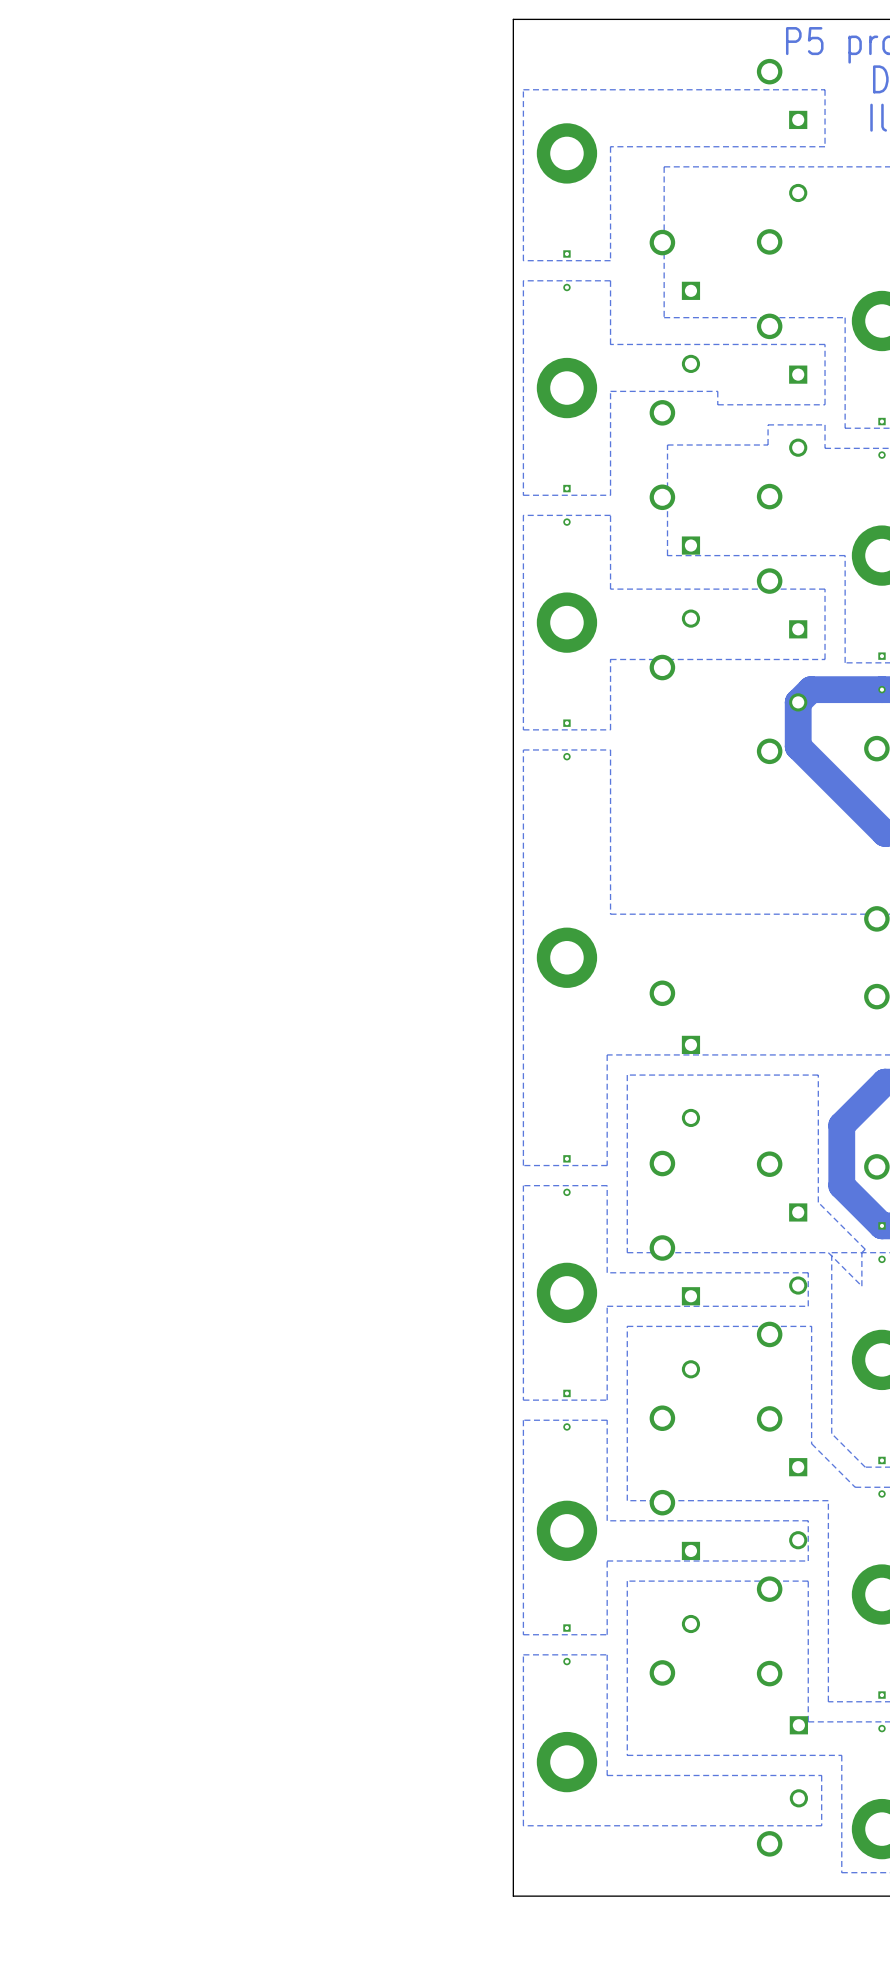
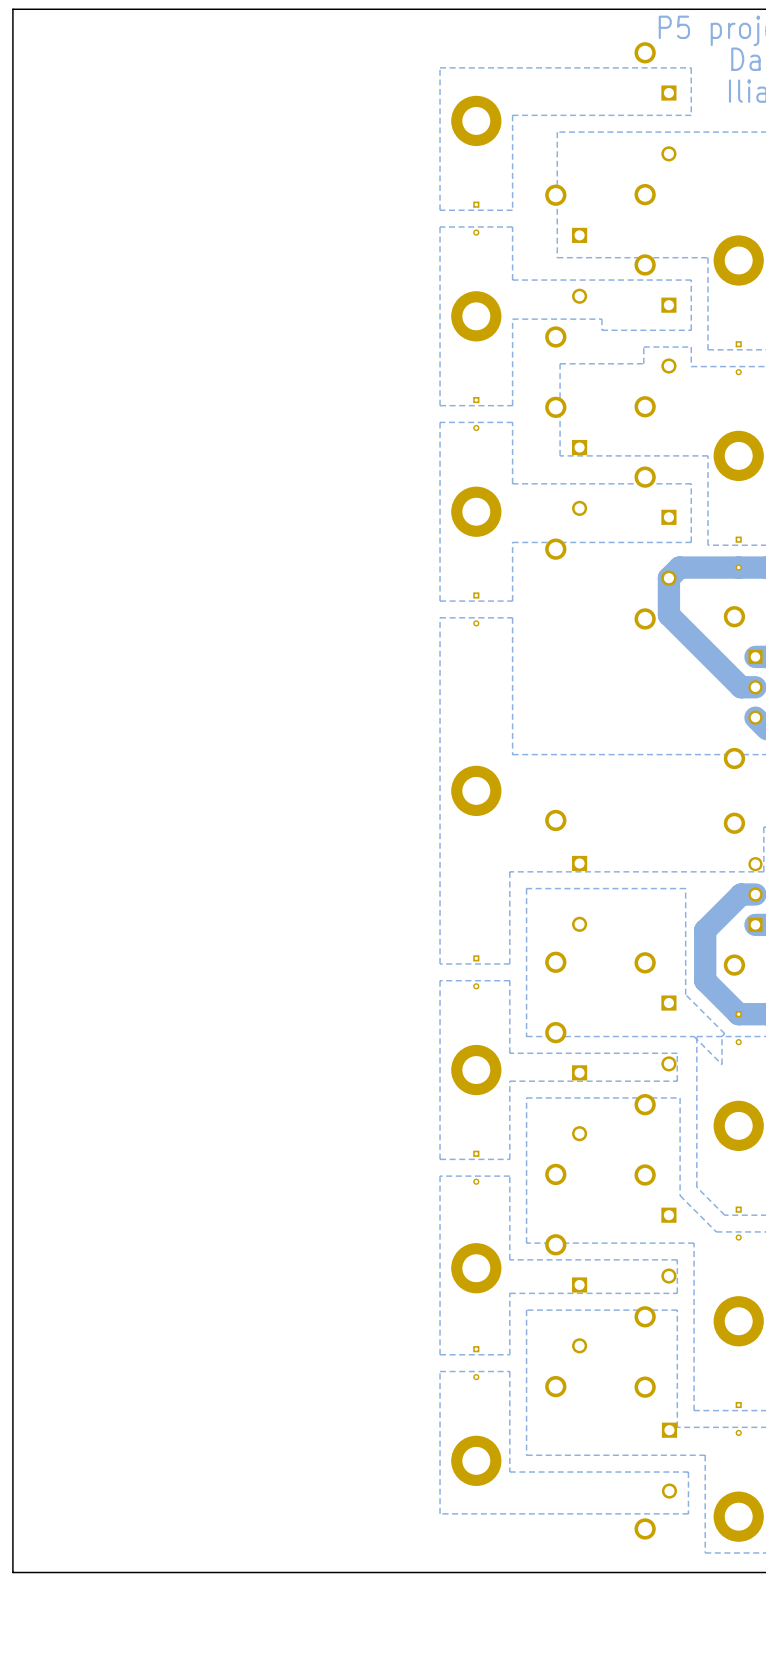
board edge: (513, 19) (513, 1896) -> (431, 9) (12, 9) (12, 1572) (431, 1572)

